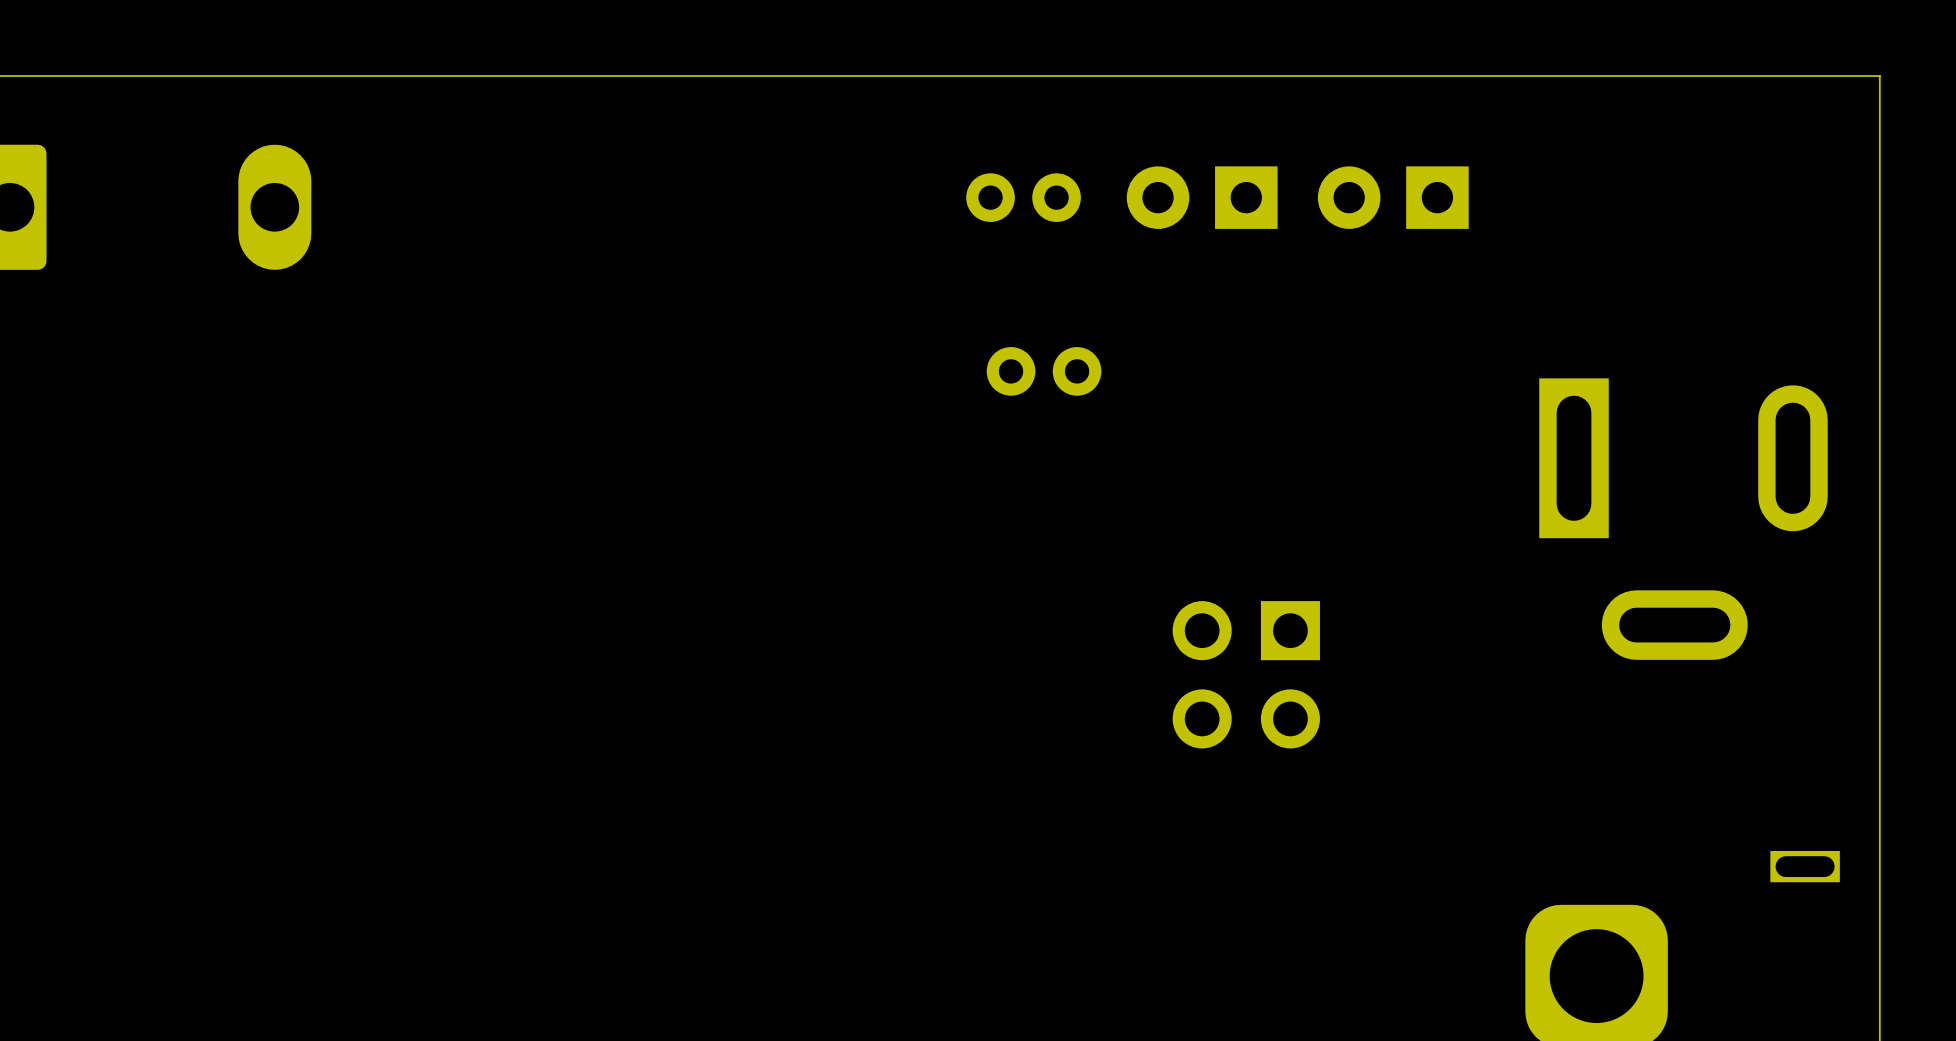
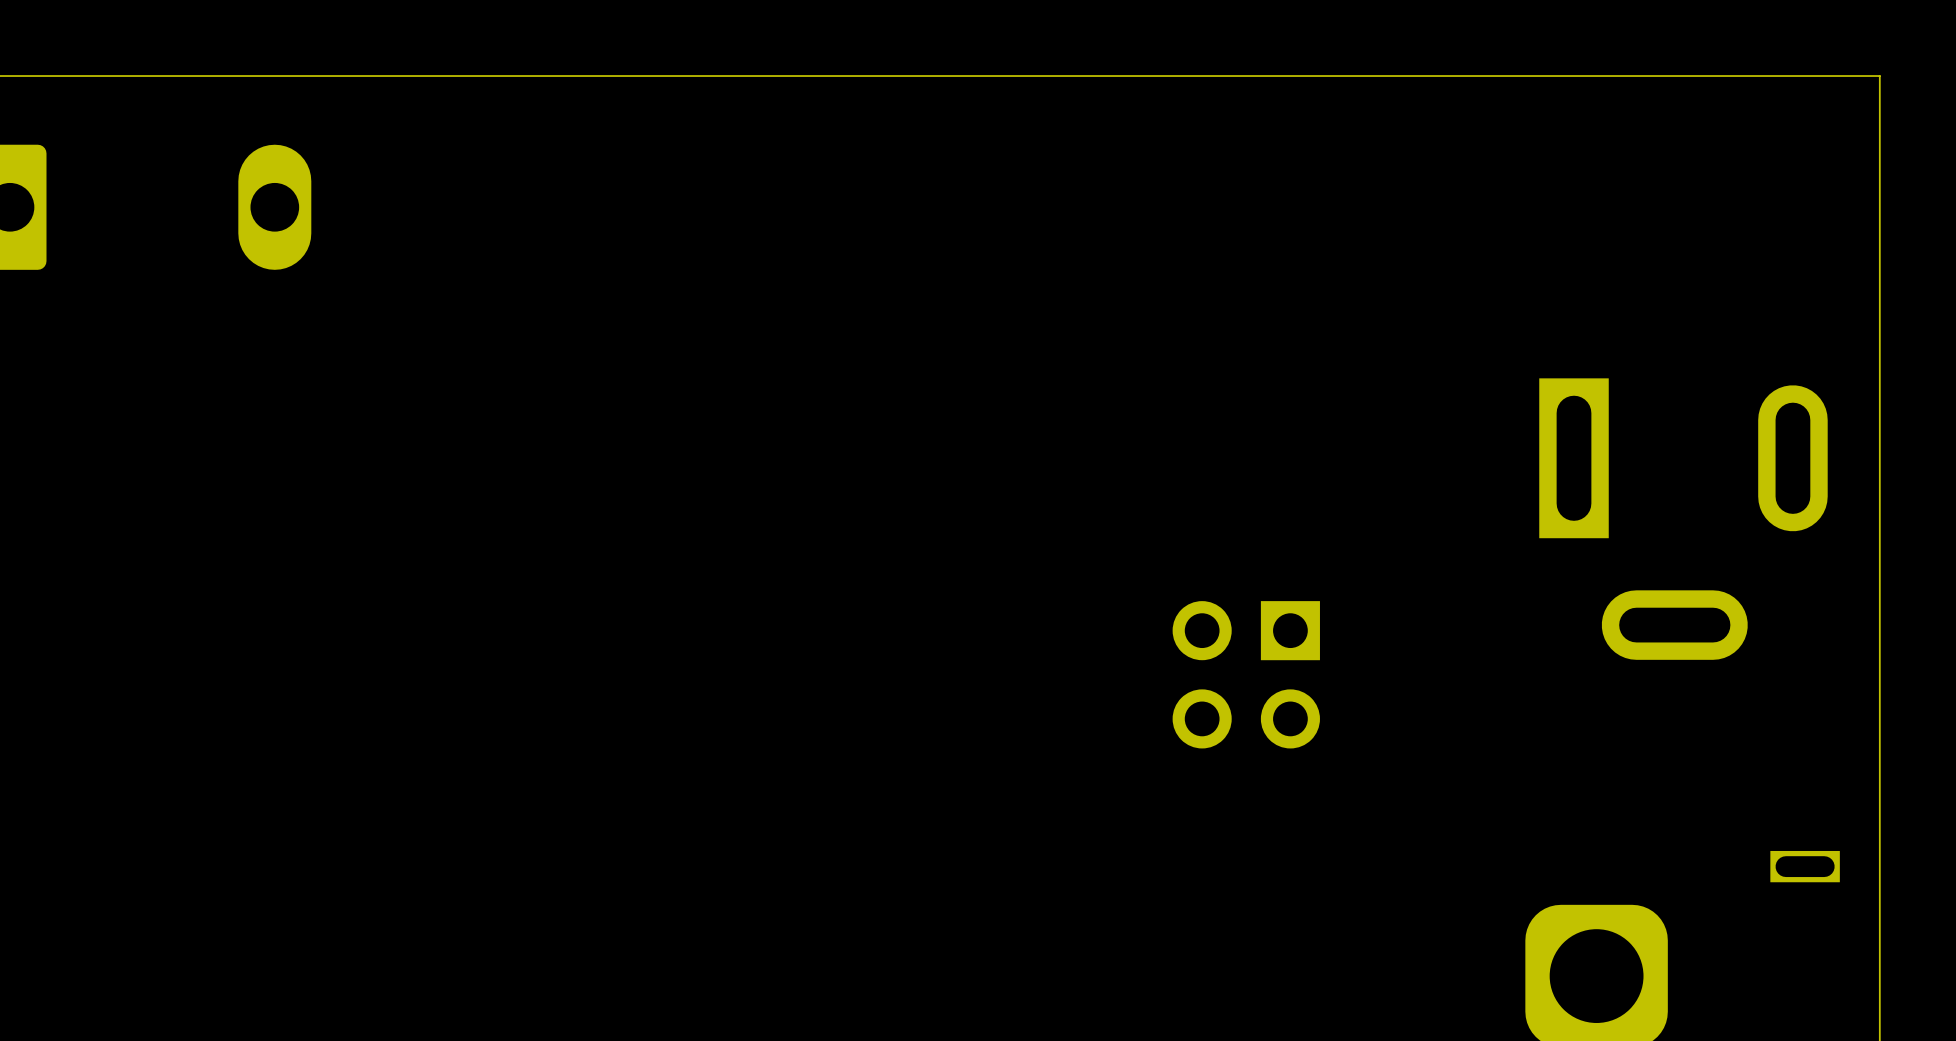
part: (1023, 197) -> none
part: (1202, 197) -> none
part: (1393, 197) -> none
part: (1044, 371) -> none

